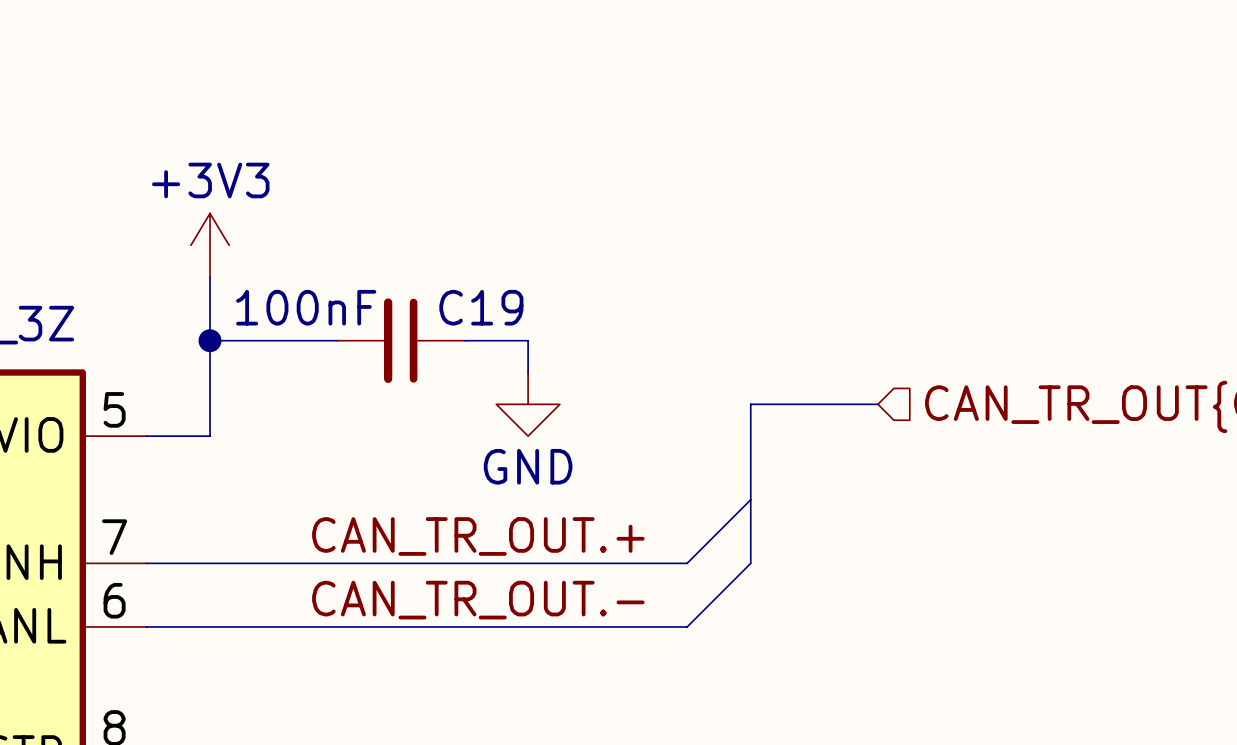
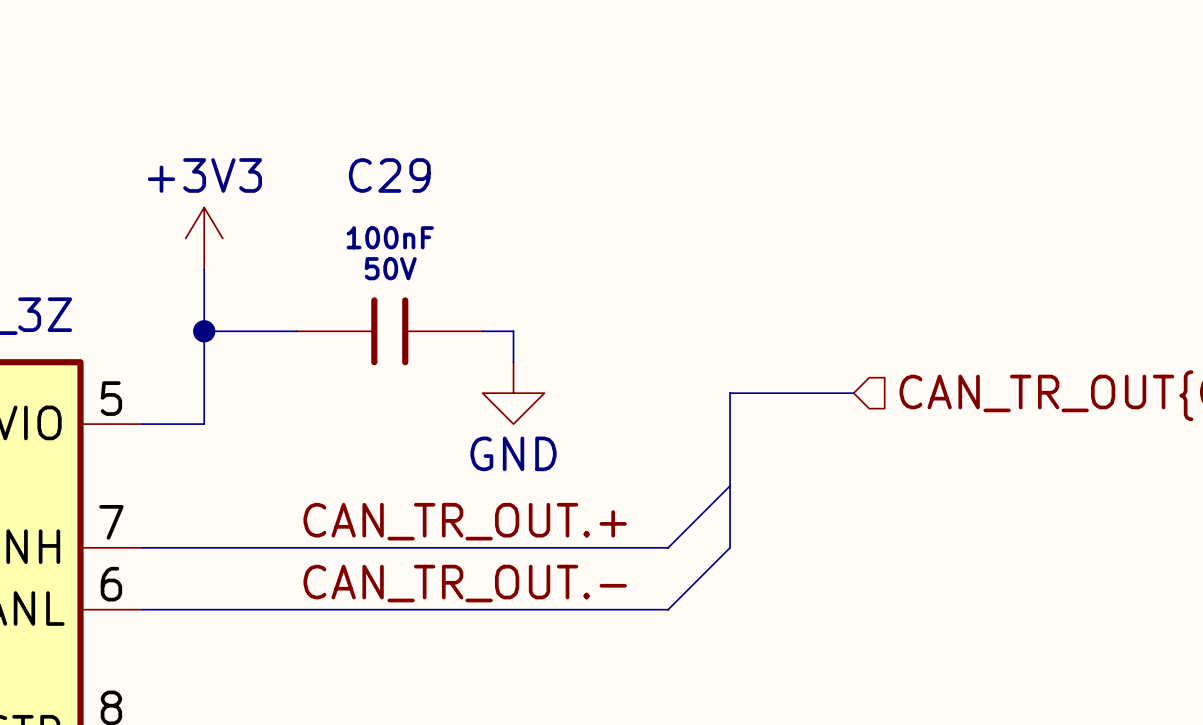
C19: 100nF (400, 340) -> none
C29: none -> 100nF (389, 331)

